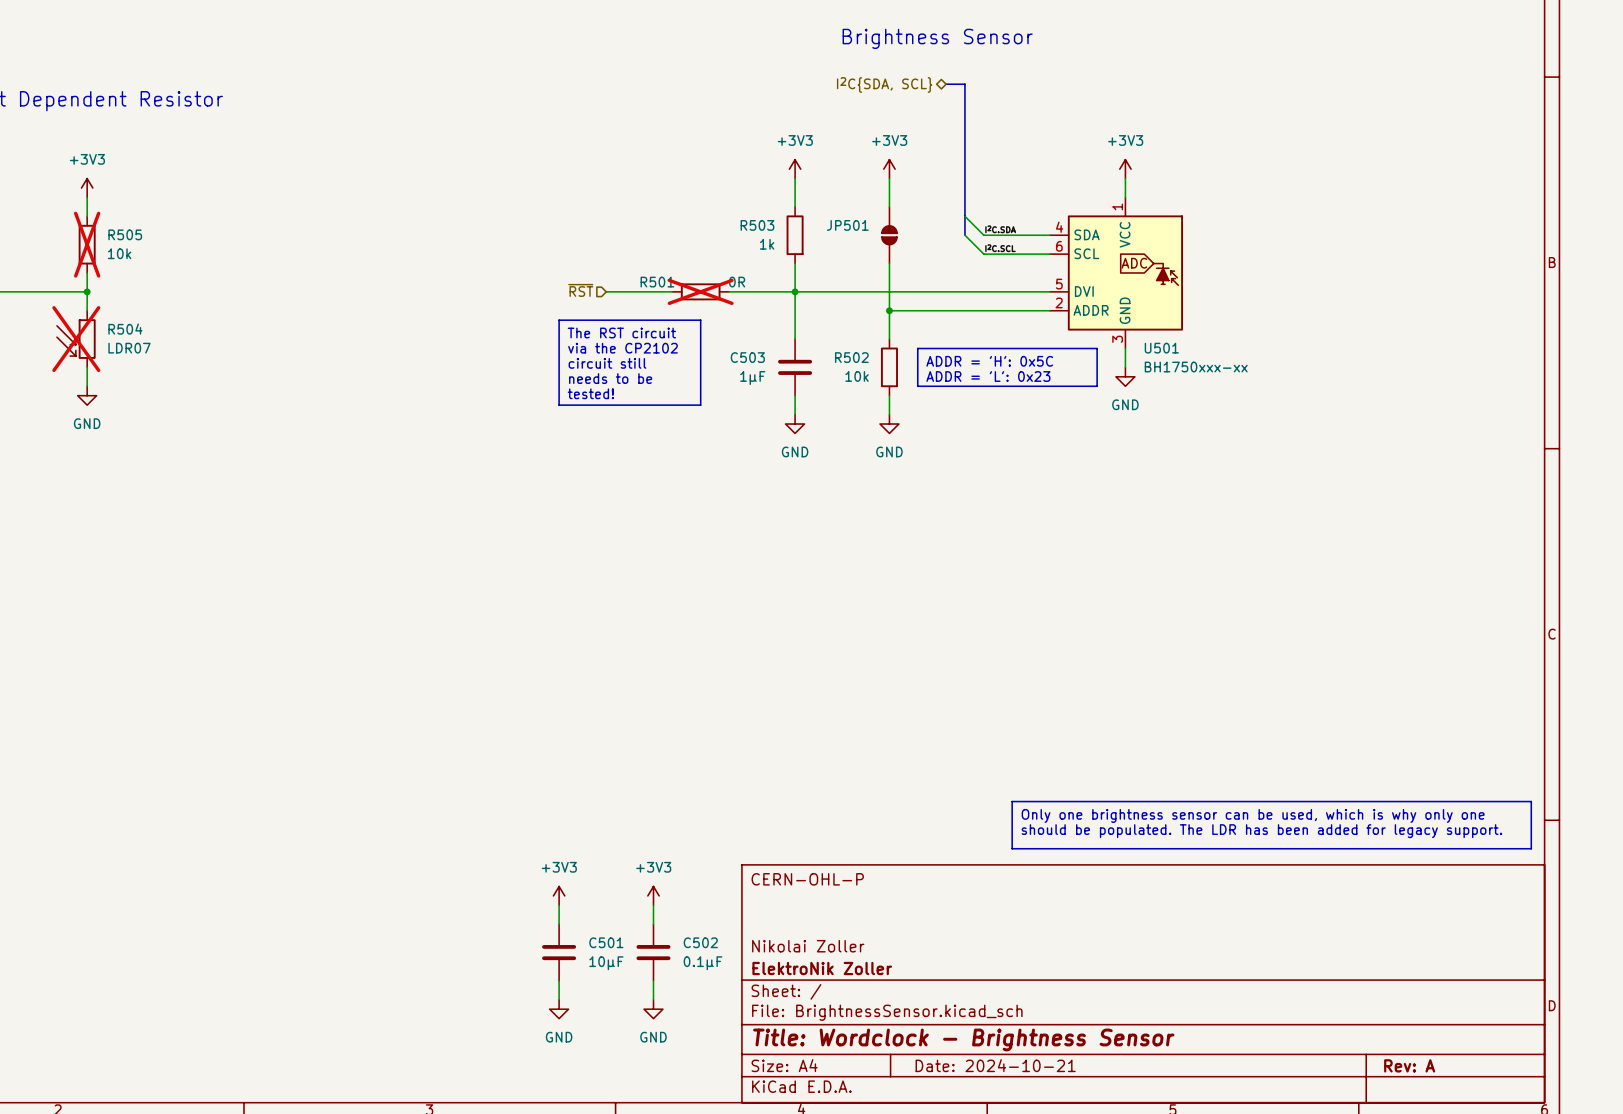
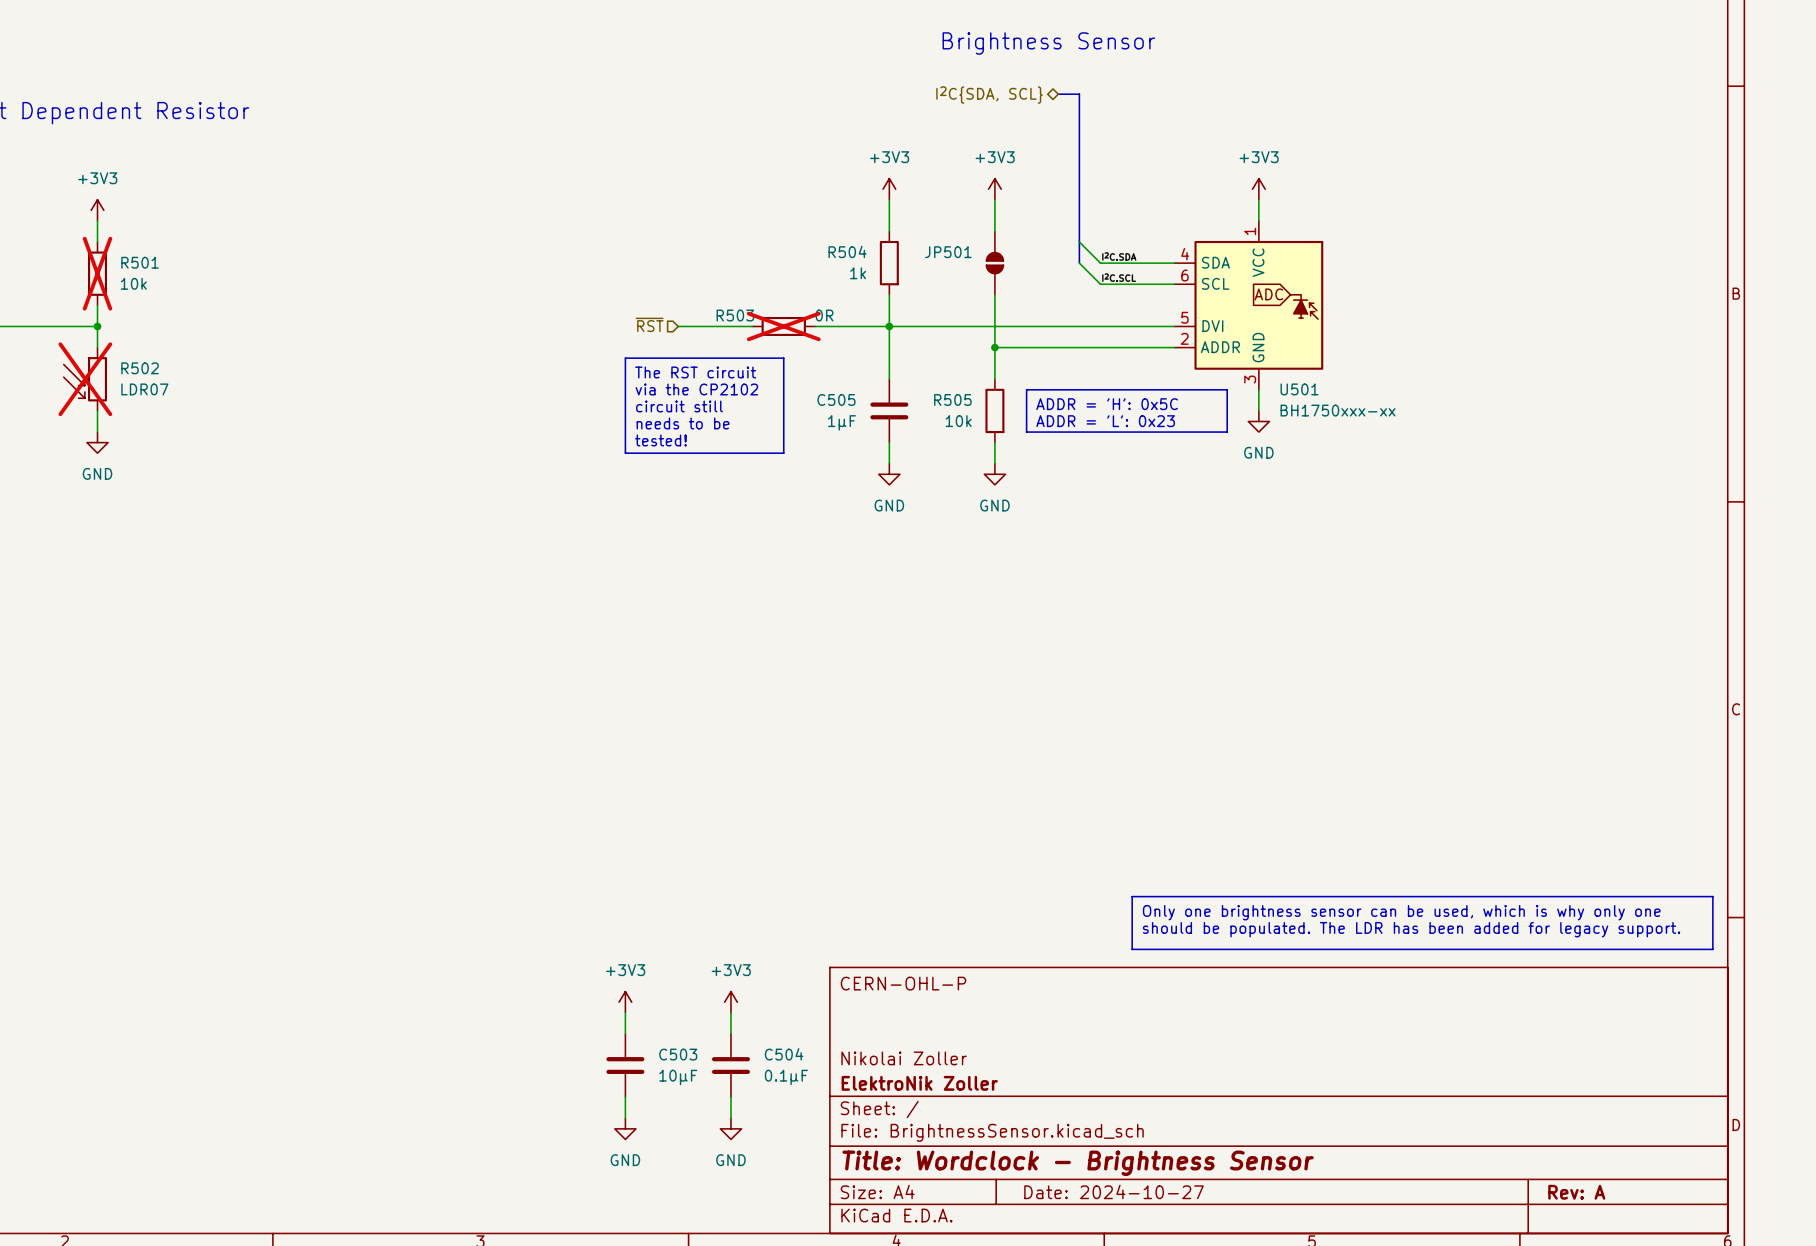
R503 name: R503 (757, 225) -> R504 (847, 251)
R505 name: R505 (125, 234) -> R501 (140, 262)
R501 name: R501 (657, 282) -> R503 (735, 315)
R504 name: R504 (125, 329) -> R502 (140, 368)
C503 name: C503 (747, 357) -> C505 (836, 399)
R502 name: R502 (851, 357) -> R505 (952, 399)
C501 name: C501 (606, 942) -> C503 (678, 1054)
C502 name: C502 (700, 942) -> C504 (784, 1054)
title block: Date: 2024-10-21 (995, 1065) -> Date: 2024-10-27 (1113, 1191)

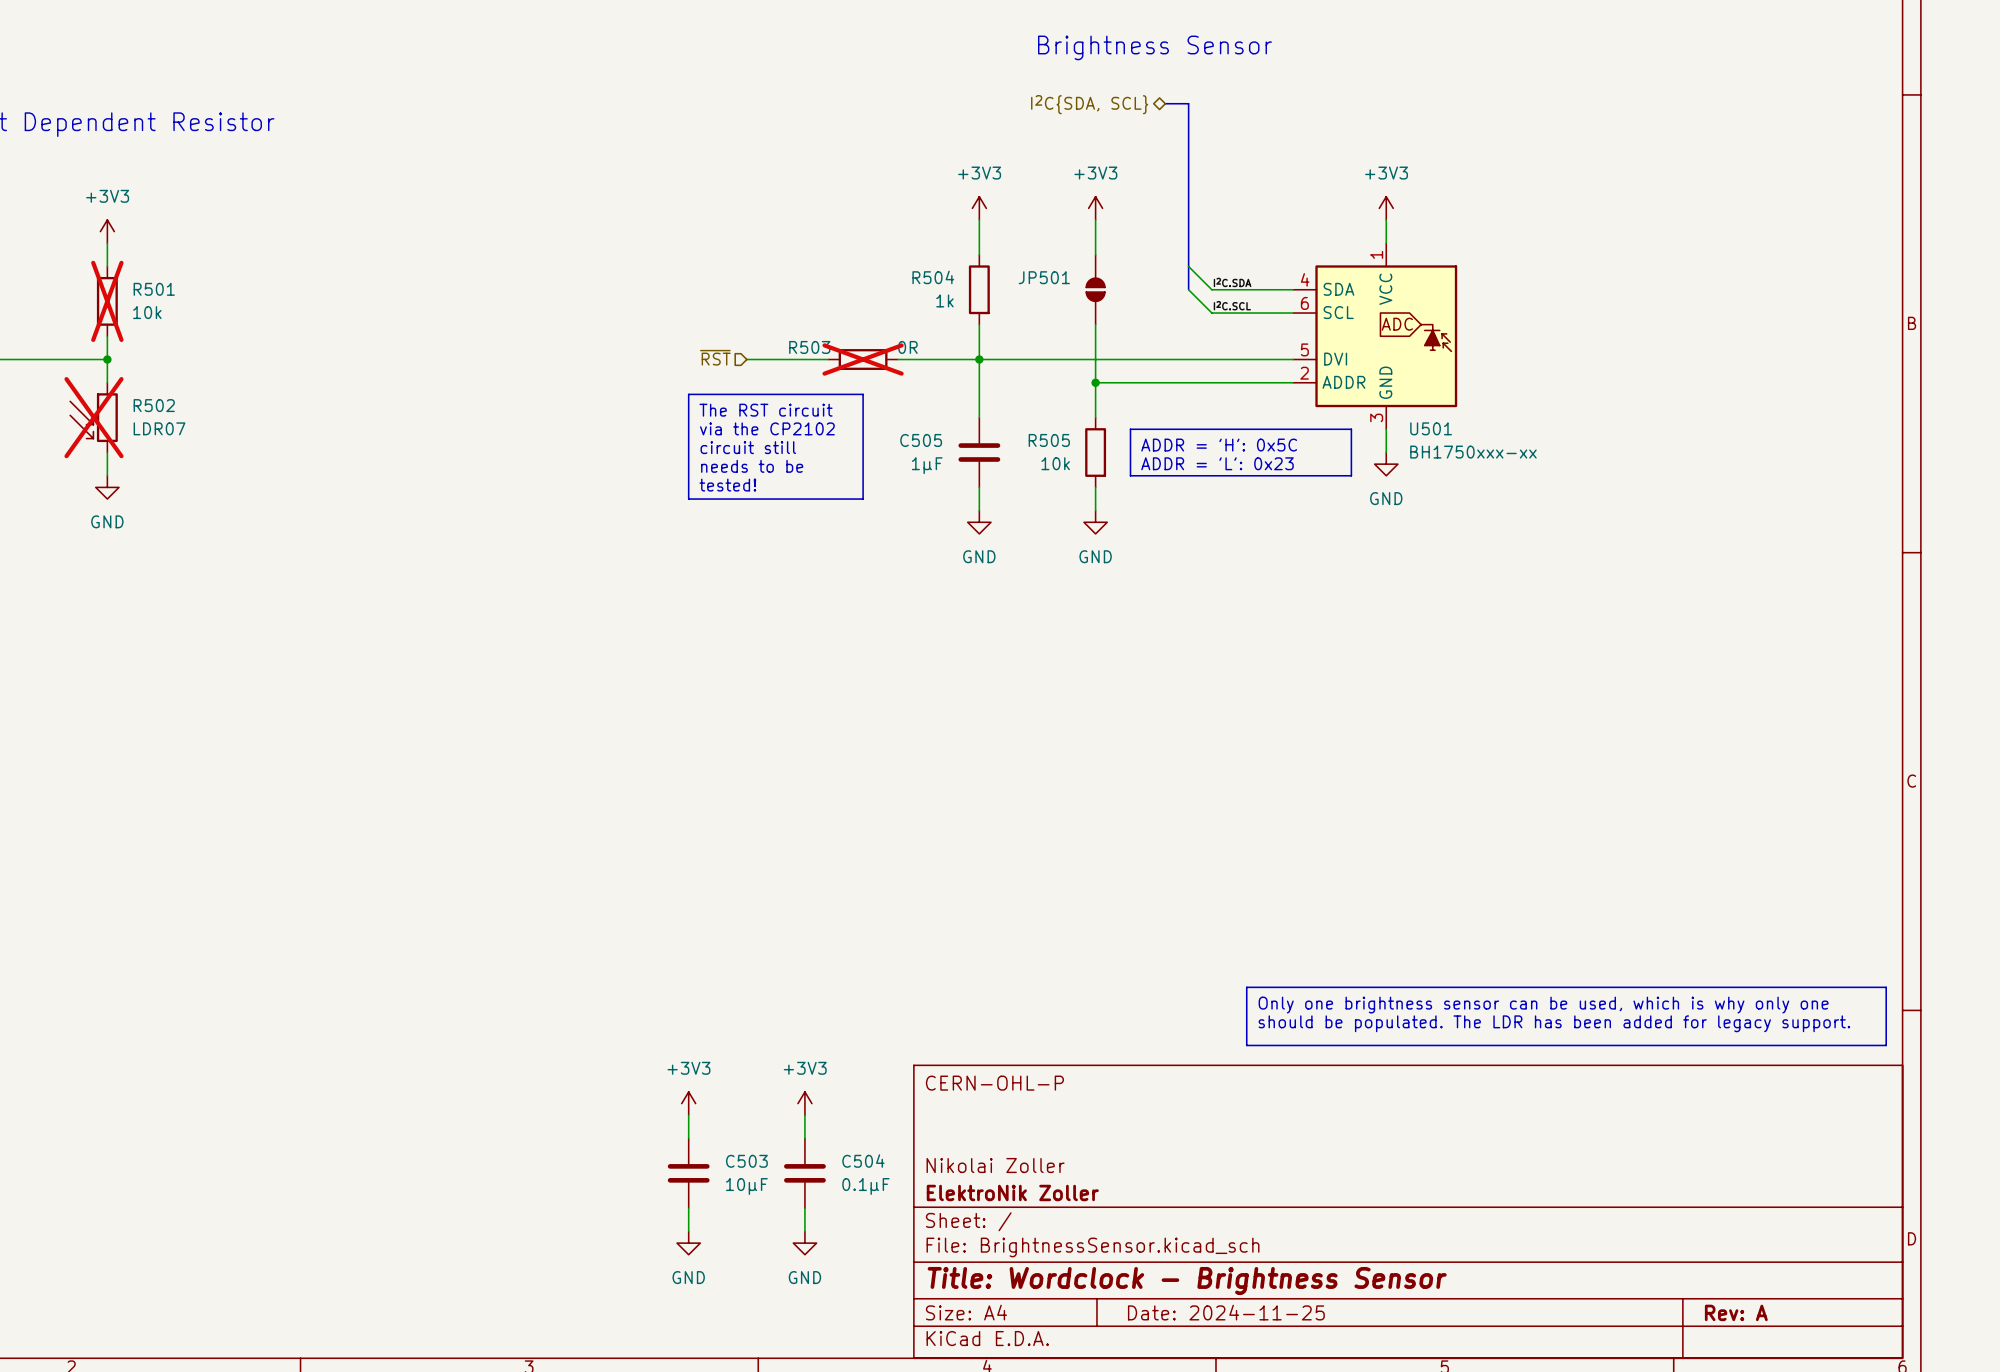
title block: Date: 2024-10-27 (1113, 1191) -> Date: 2024-11-25 (1226, 1312)

